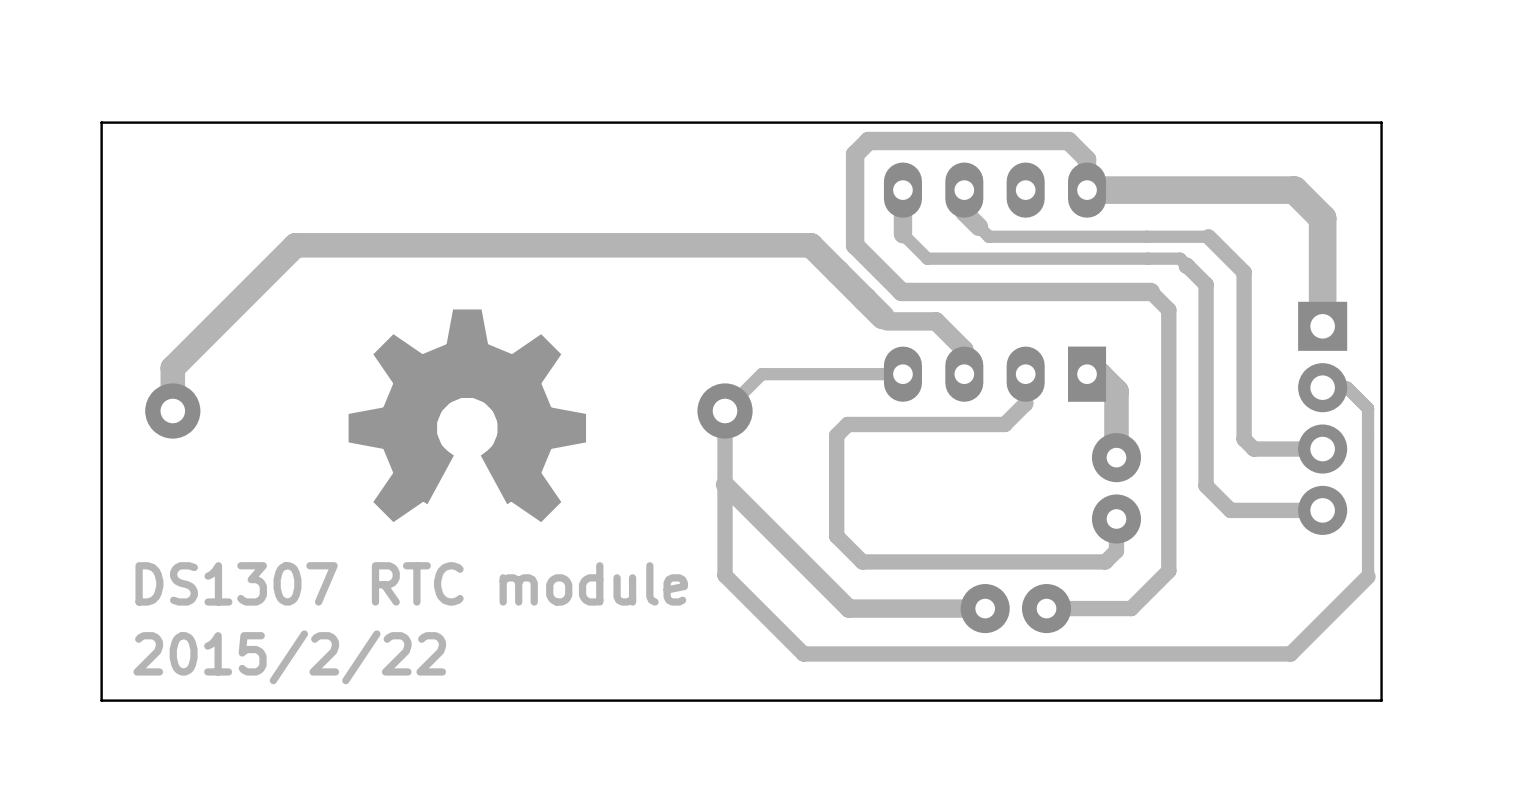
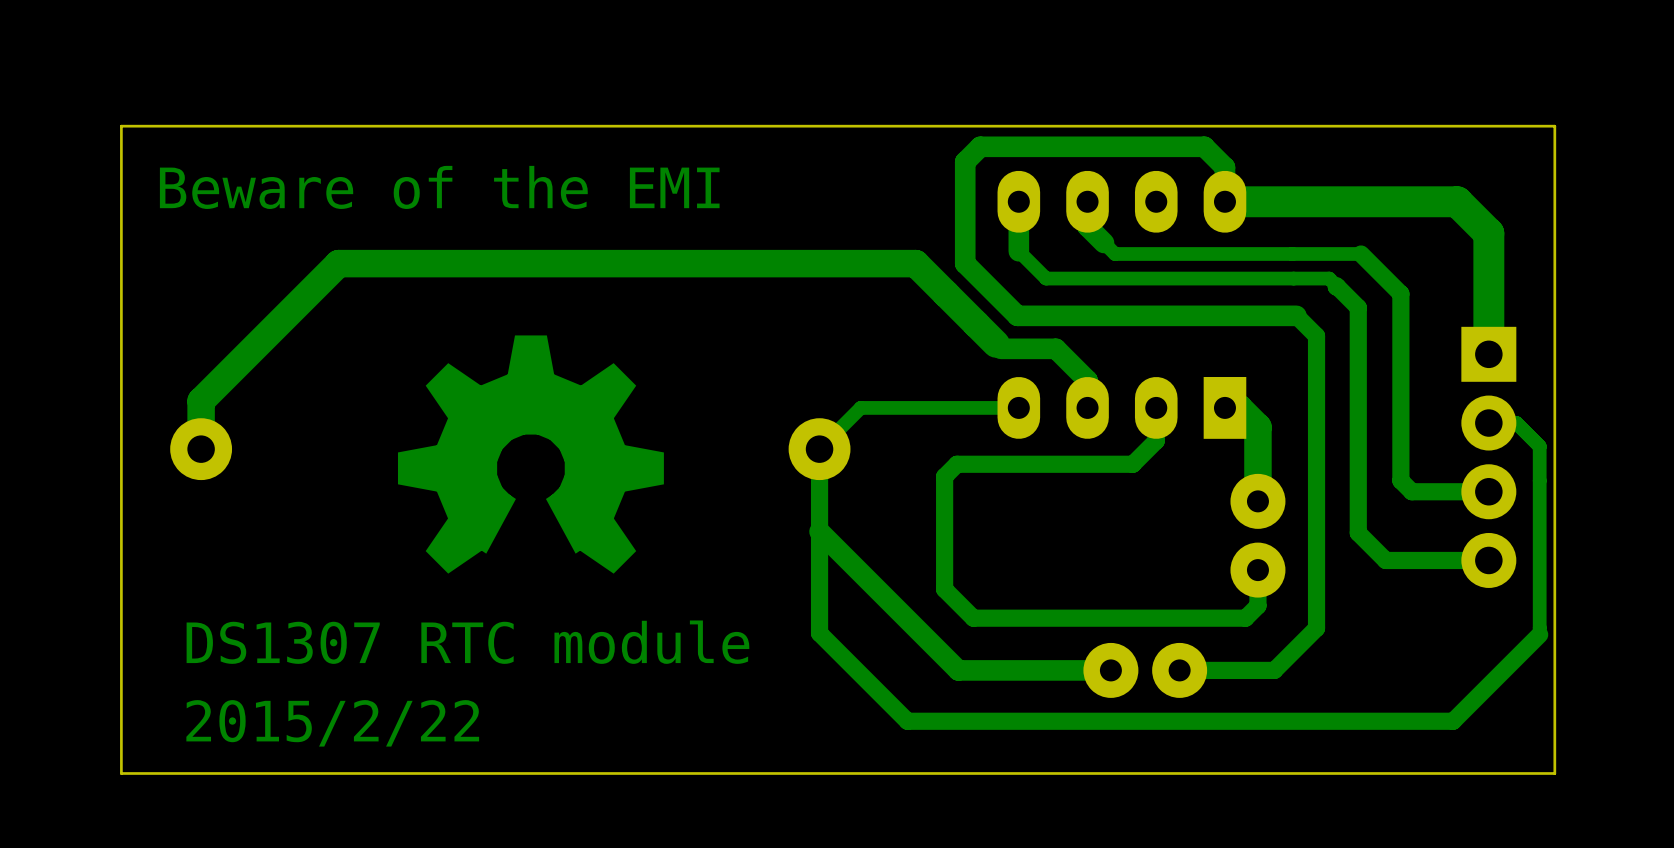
text: none -> Beware of the EMI (439, 187)

